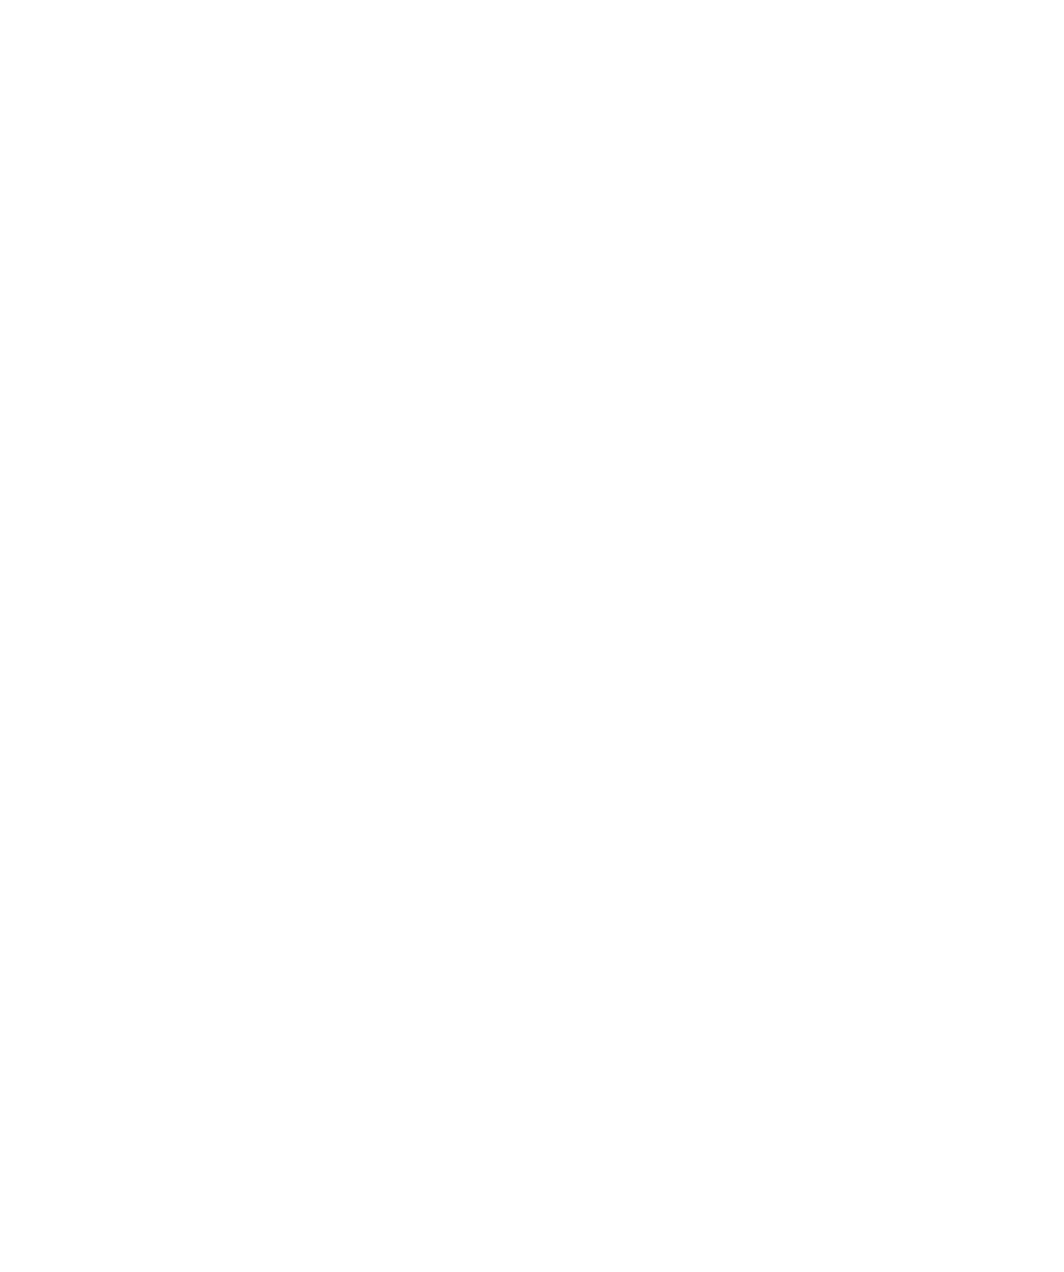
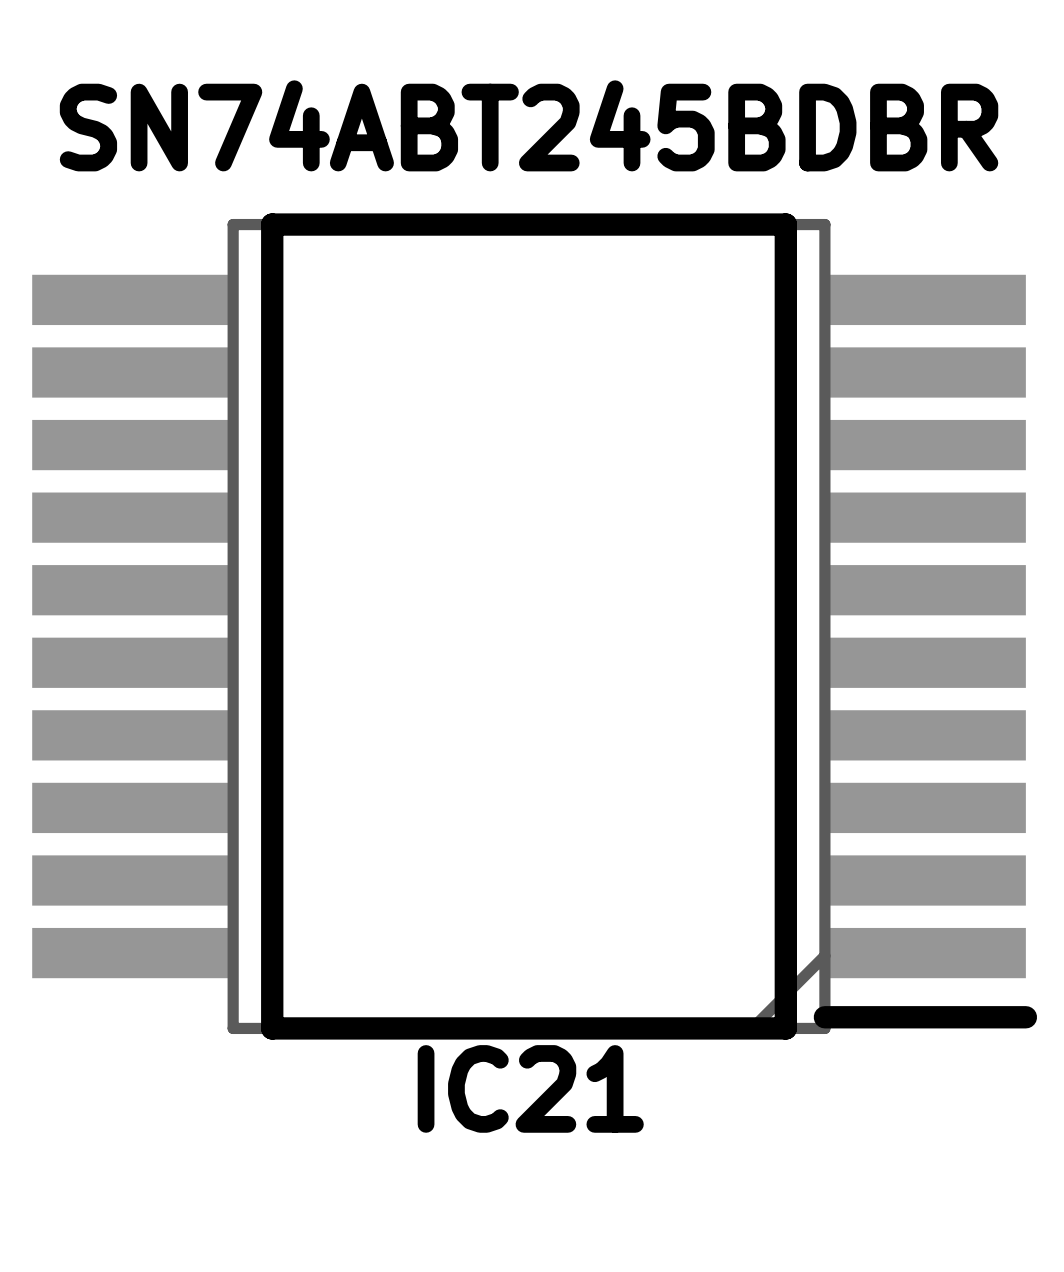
IC21: none -> SN74ABT245BDBR (534, 626)

